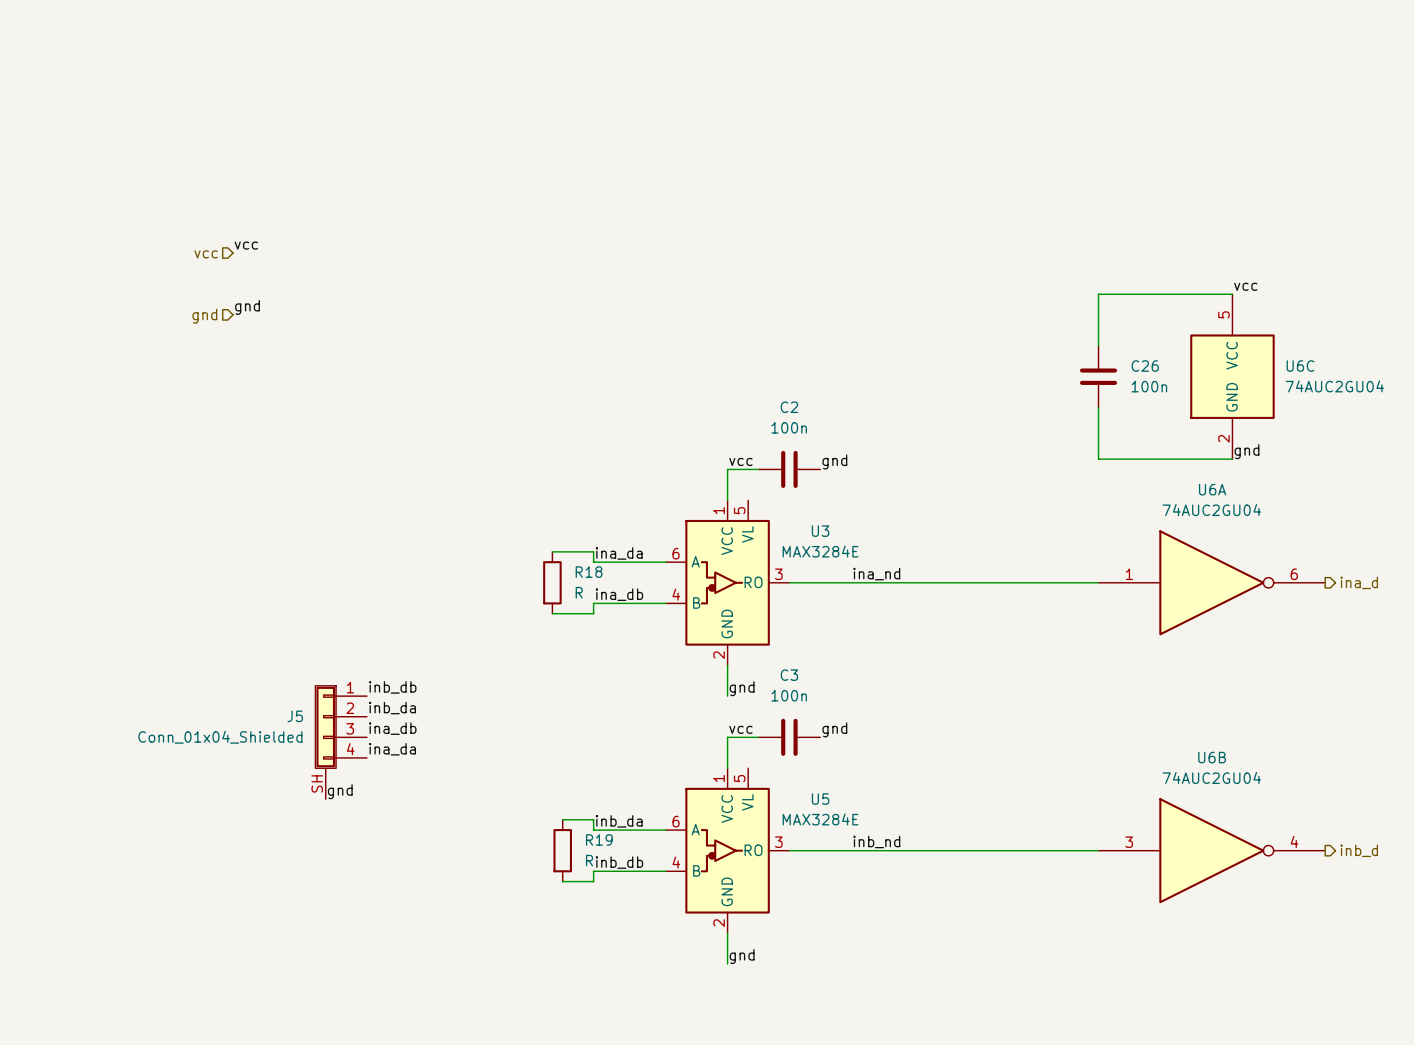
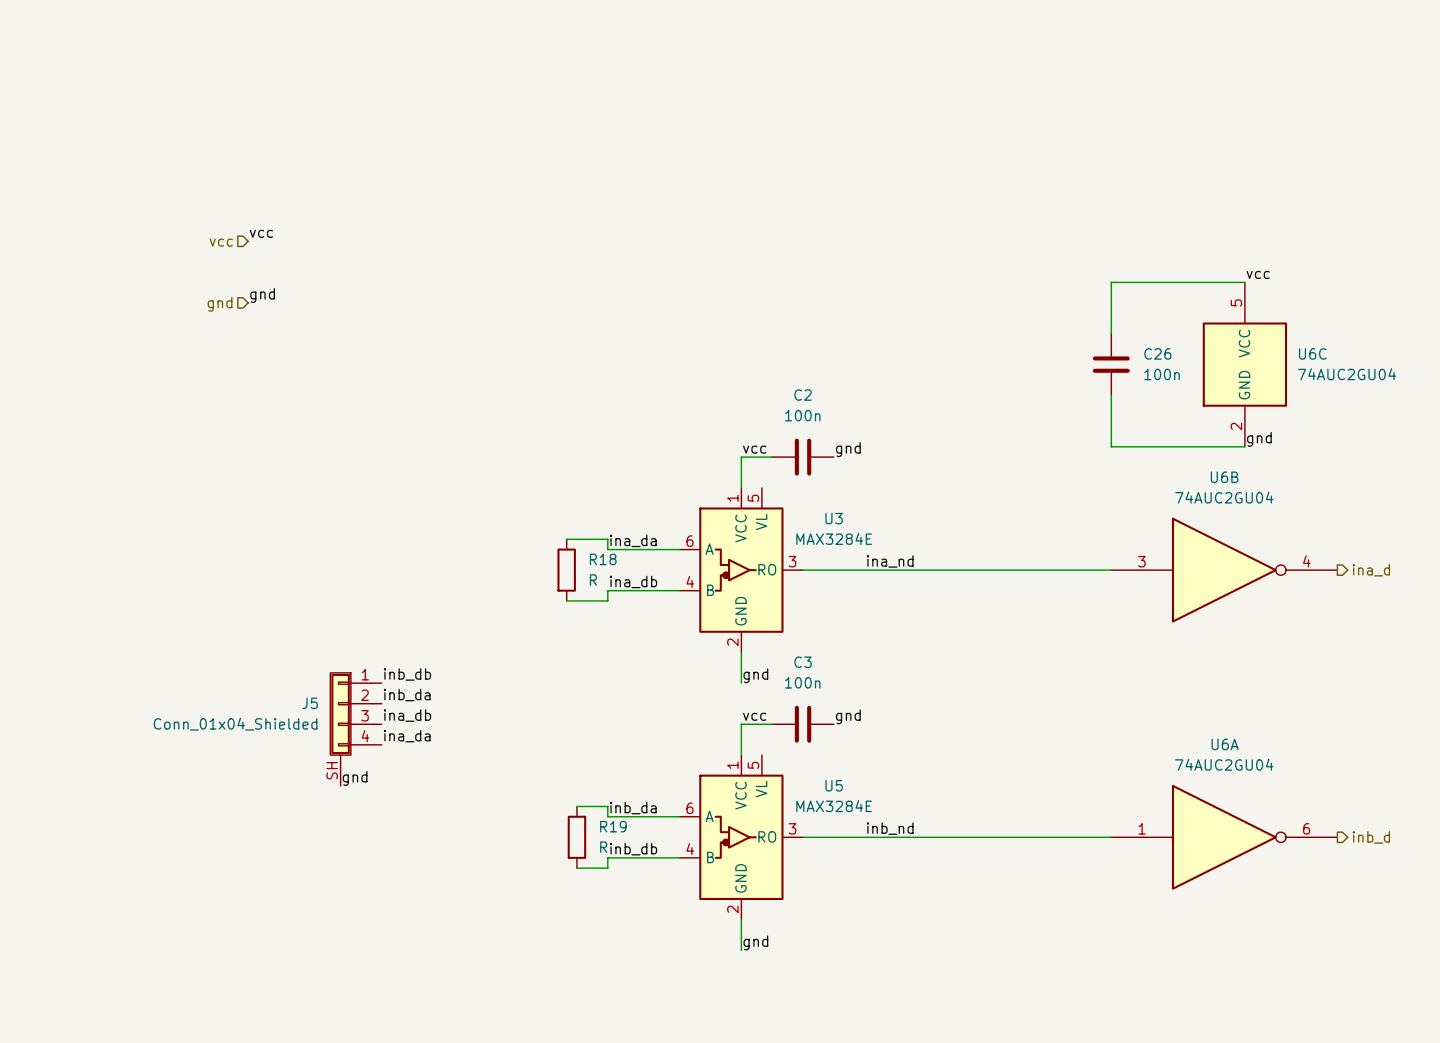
U6A position: (1211, 582) -> (1224, 837)
U6B position: (1211, 850) -> (1224, 570)

